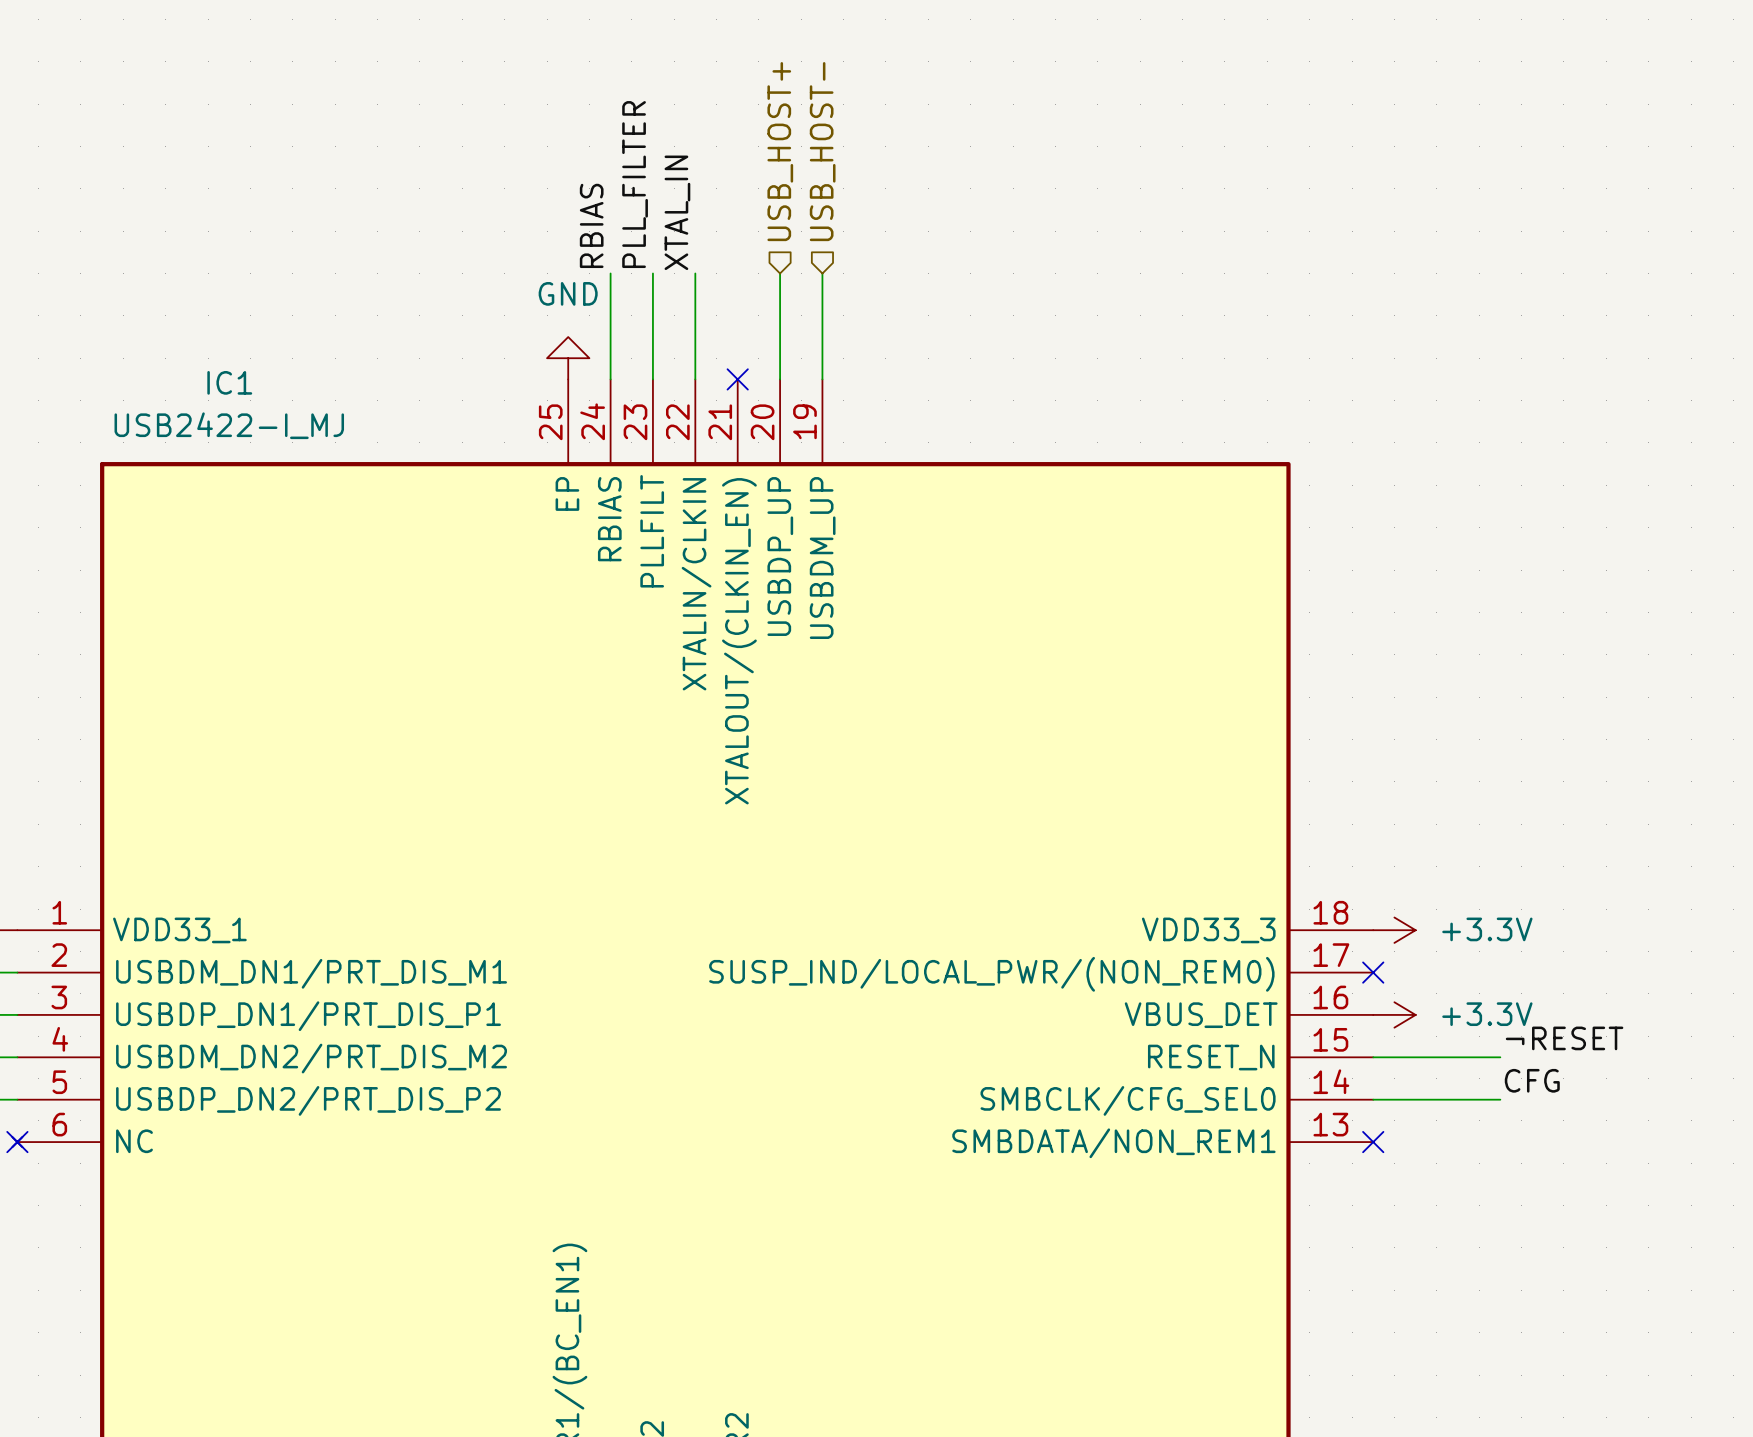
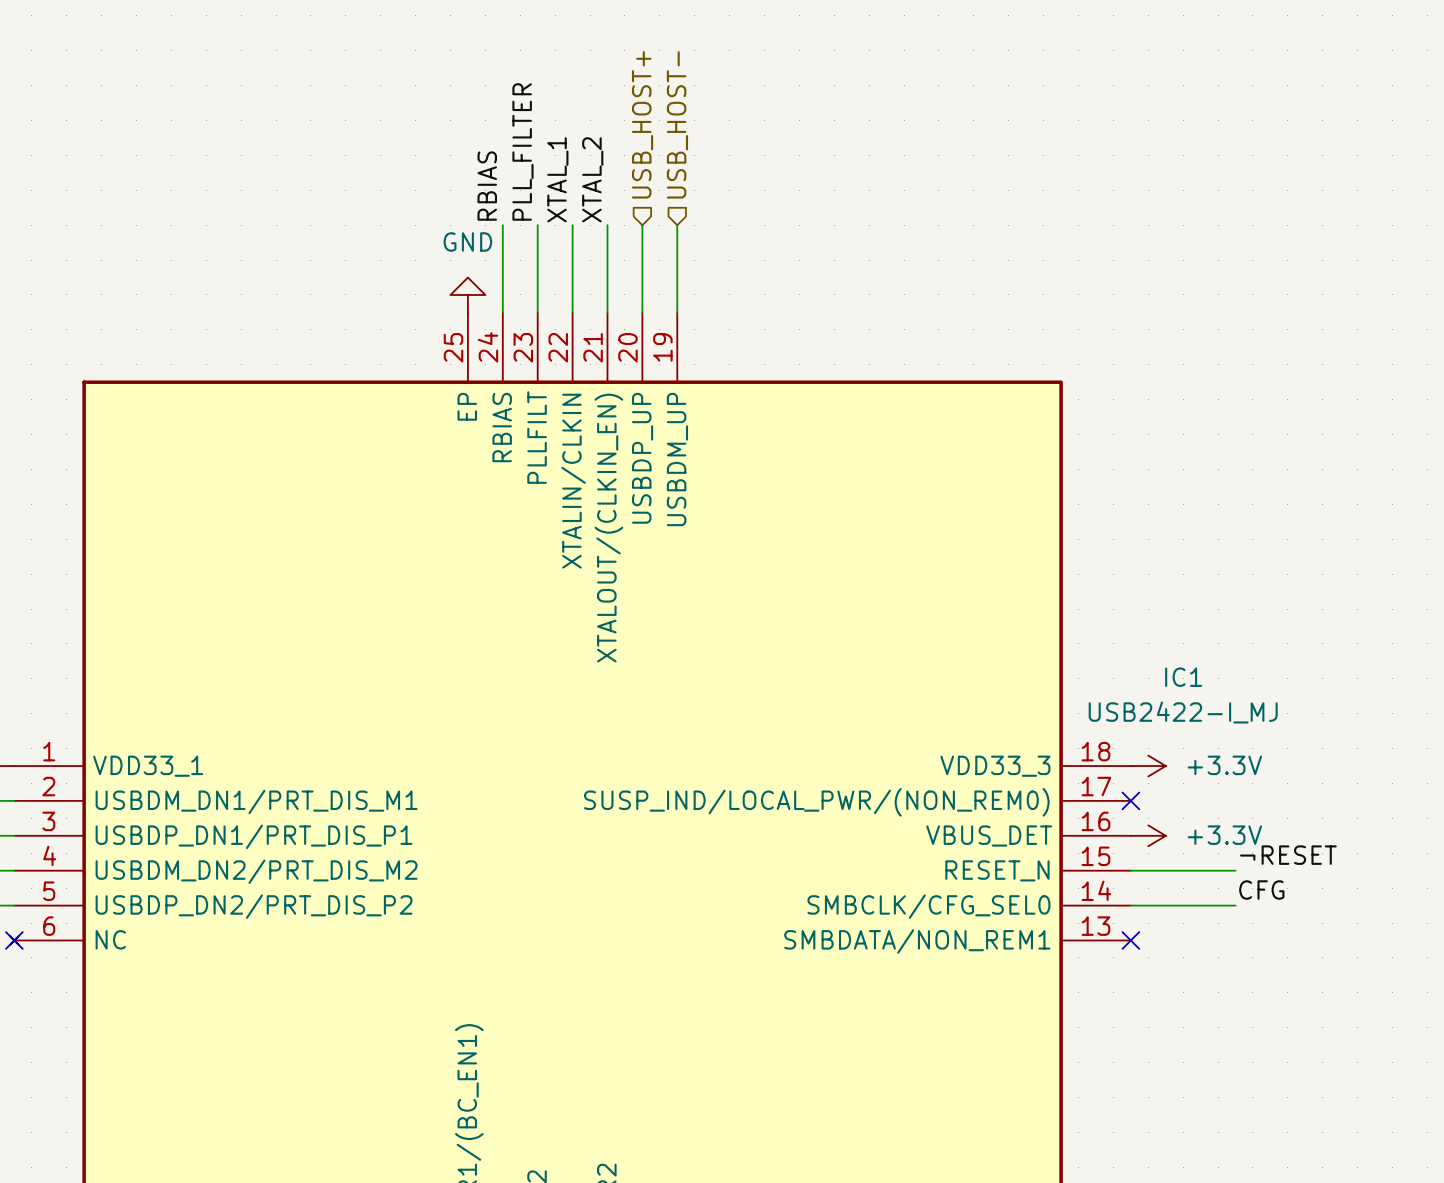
label: XTAL_IN (677, 212) -> XTAL_1 (557, 179)
label: none -> XTAL_2 (592, 179)
wire: none -> (607, 225) (607, 312)
no-connect mark: (737, 379) -> none
IC1 name position: IC1 (229, 382) -> IC1 (1183, 677)
IC1 value position: USB2422-I_MJ (229, 425) -> USB2422-I_MJ (1183, 712)

